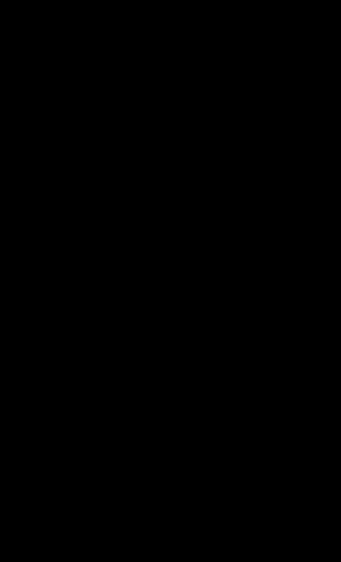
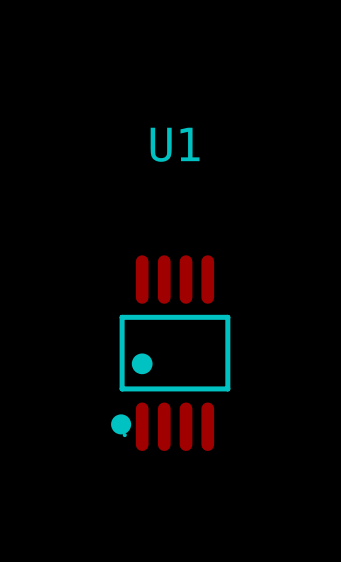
U1: none -> (170, 353)

